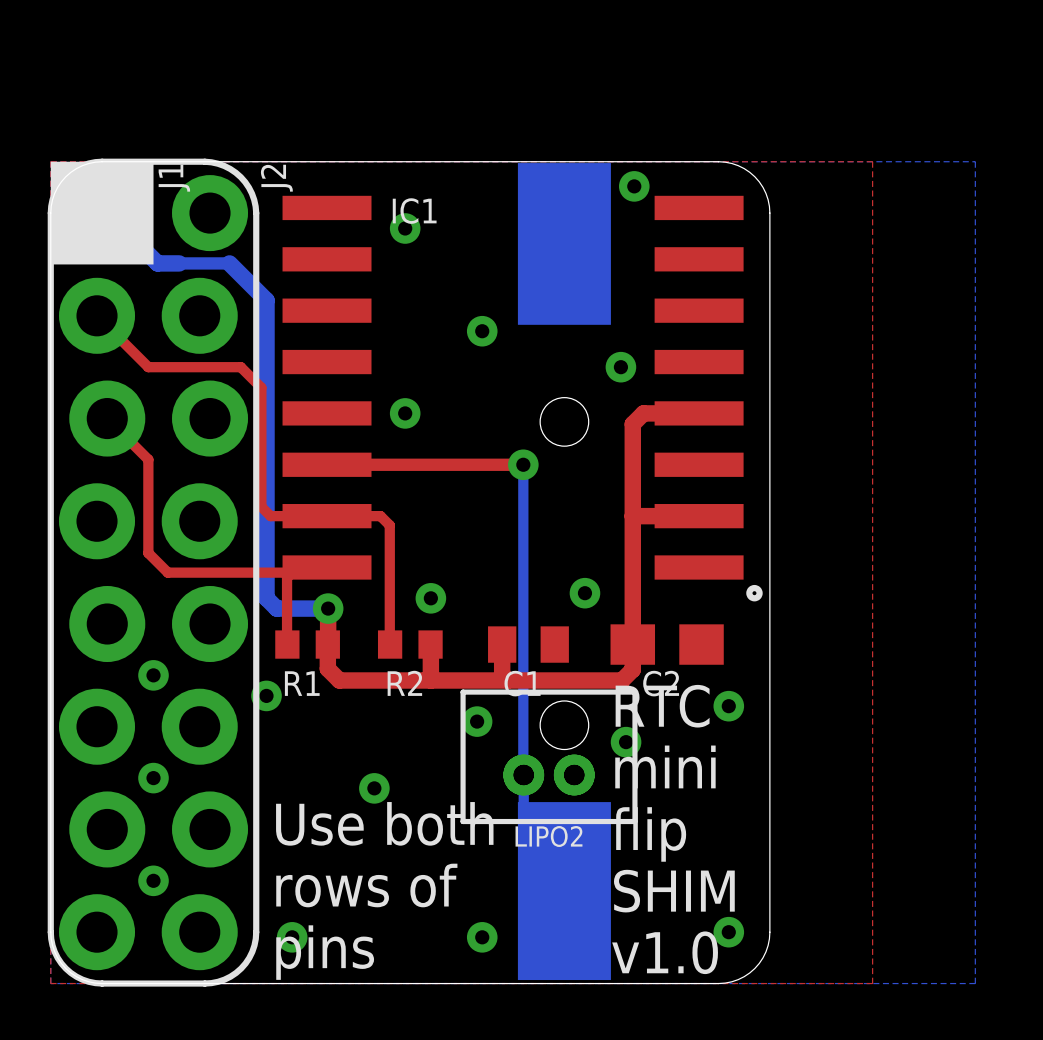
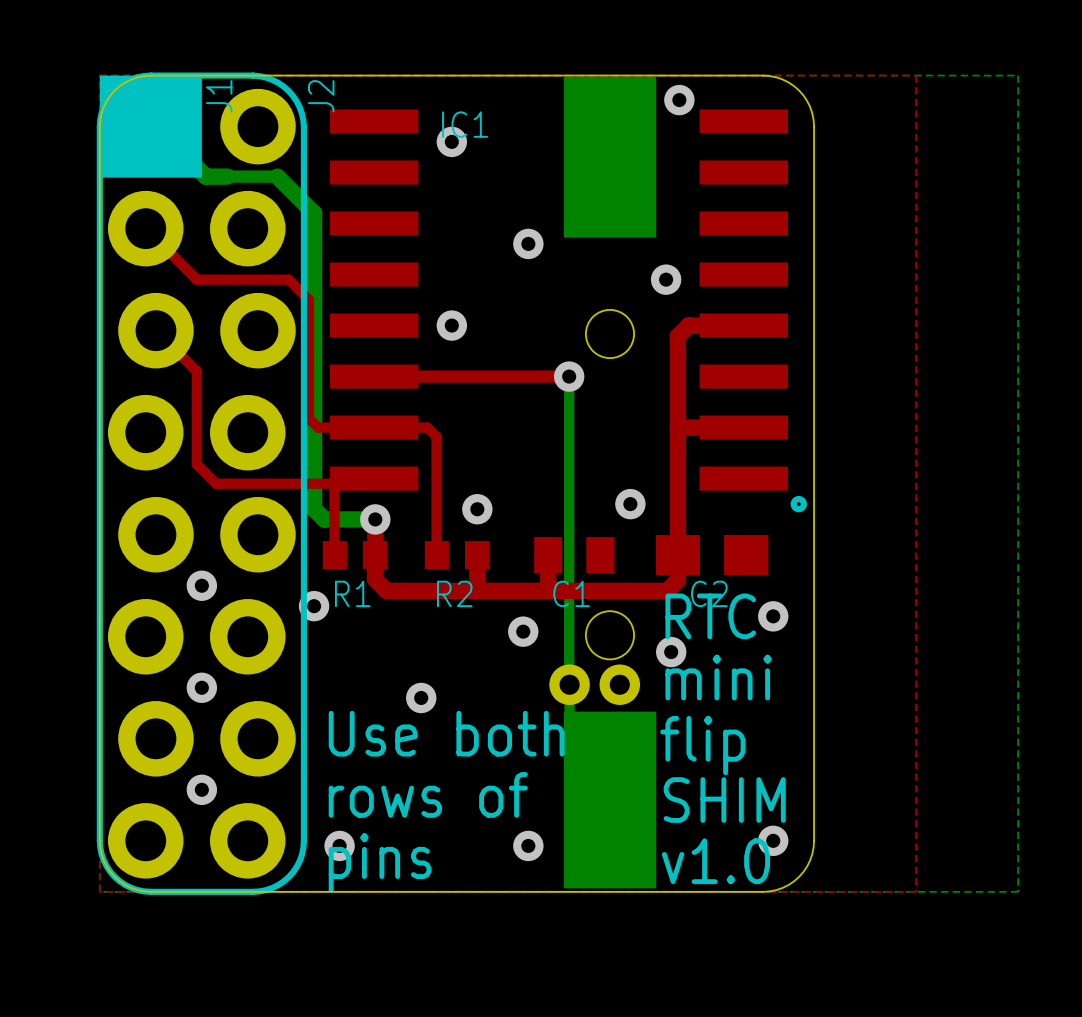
LIPO2: (549, 756) -> none

